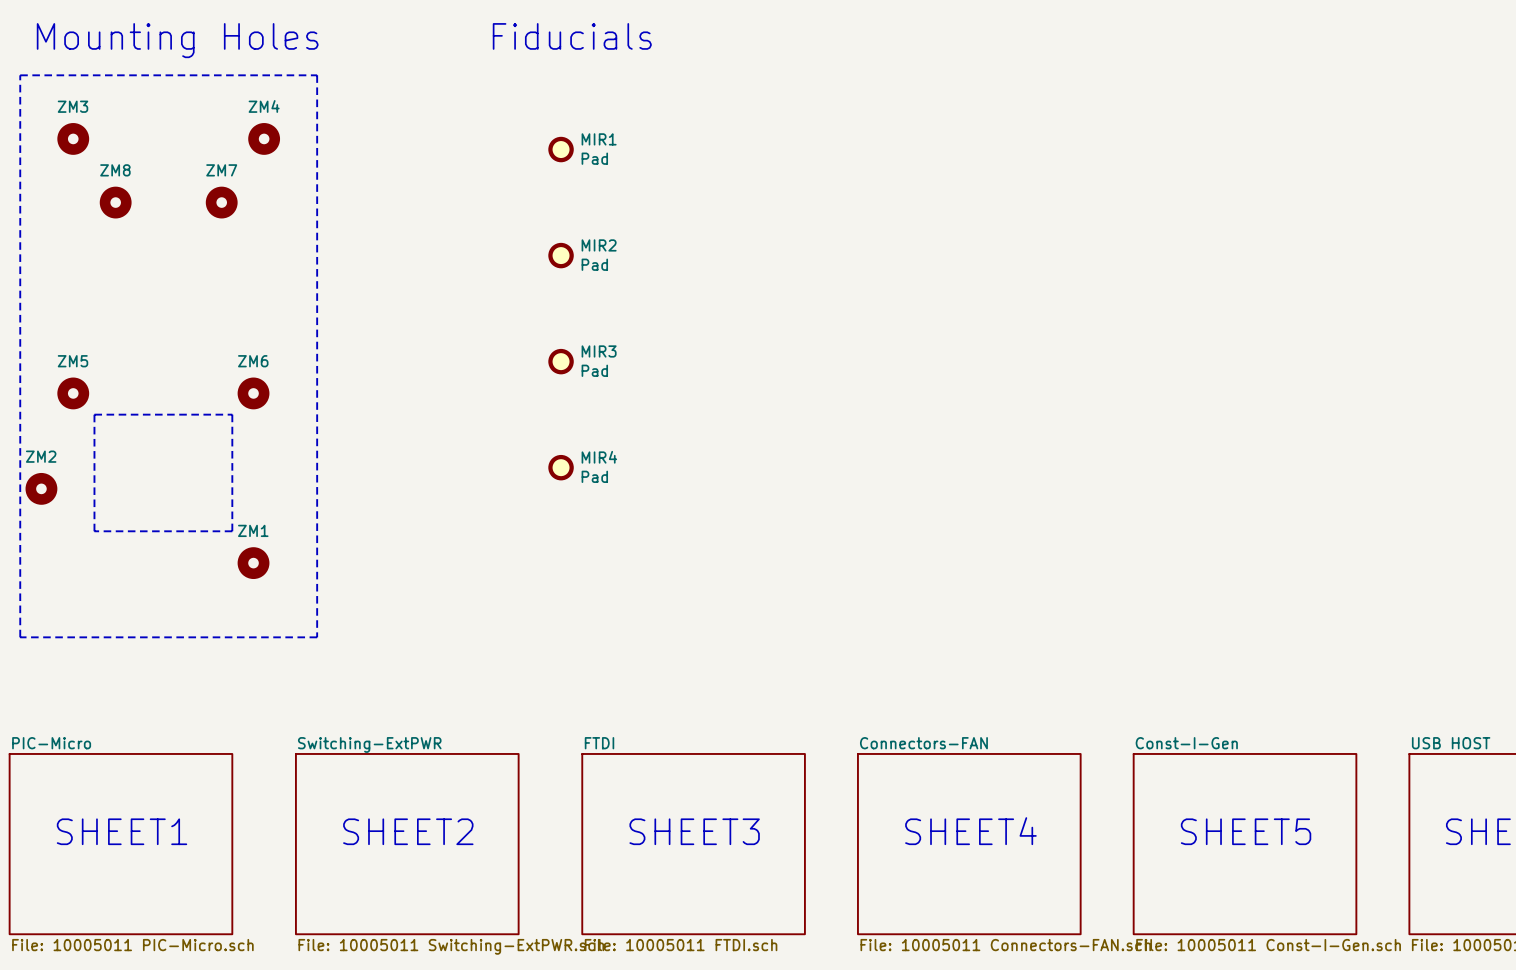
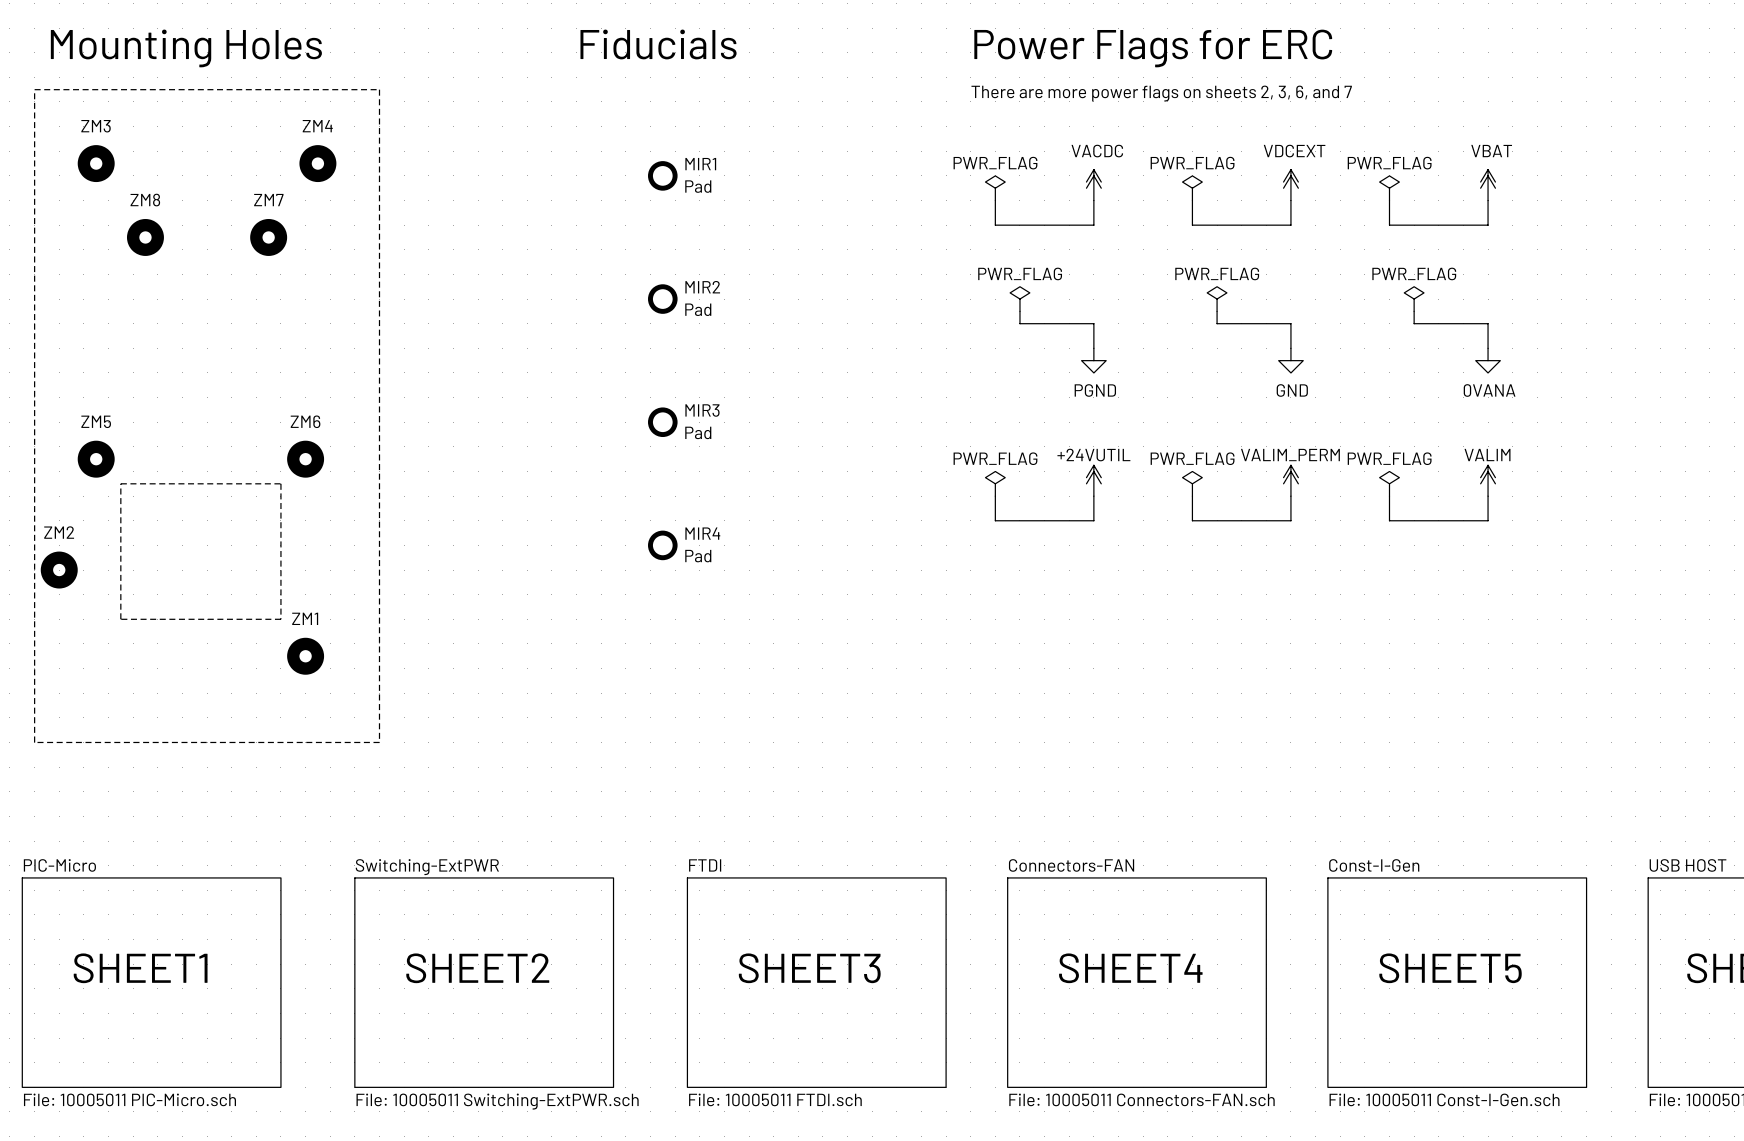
text: none -> Power Flags for ERC (1153, 48)
text: none -> There are more power flags on sheets 2, 3, 6, and 7 (1161, 93)
power symbol: none -> VACDC (1093, 185)
power symbol: none -> VDCEXT (1290, 185)
power symbol: none -> VBAT (1488, 185)
power symbol: none -> PWR_FLAG (995, 188)
power symbol: none -> PWR_FLAG (1192, 188)
power symbol: none -> PWR_FLAG (1389, 188)
wire: none -> (995, 200) (995, 225) (1093, 225) (1093, 200)
wire: none -> (1192, 200) (1192, 225) (1290, 225) (1290, 200)
wire: none -> (1389, 200) (1389, 225) (1488, 225) (1488, 200)
power symbol: none -> PWR_FLAG (1019, 299)
power symbol: none -> PWR_FLAG (1217, 299)
power symbol: none -> PWR_FLAG (1414, 299)
wire: none -> (1019, 311) (1019, 323) (1093, 323) (1093, 348)
wire: none -> (1217, 311) (1217, 323) (1290, 323) (1290, 348)
wire: none -> (1414, 311) (1414, 323) (1488, 323) (1488, 348)
power symbol: none -> PGND (1093, 360)
power symbol: none -> GND (1290, 360)
power symbol: none -> 0VANA (1488, 360)
power symbol: none -> +24VUTIL (1093, 480)
power symbol: none -> VALIM_PERM (1290, 480)
power symbol: none -> VALIM (1488, 480)
power symbol: none -> PWR_FLAG (995, 483)
power symbol: none -> PWR_FLAG (1192, 483)
power symbol: none -> PWR_FLAG (1389, 483)
wire: none -> (995, 496) (995, 520) (1093, 520) (1093, 496)
wire: none -> (1192, 496) (1192, 520) (1290, 520) (1290, 496)
wire: none -> (1389, 496) (1389, 520) (1488, 520) (1488, 496)

